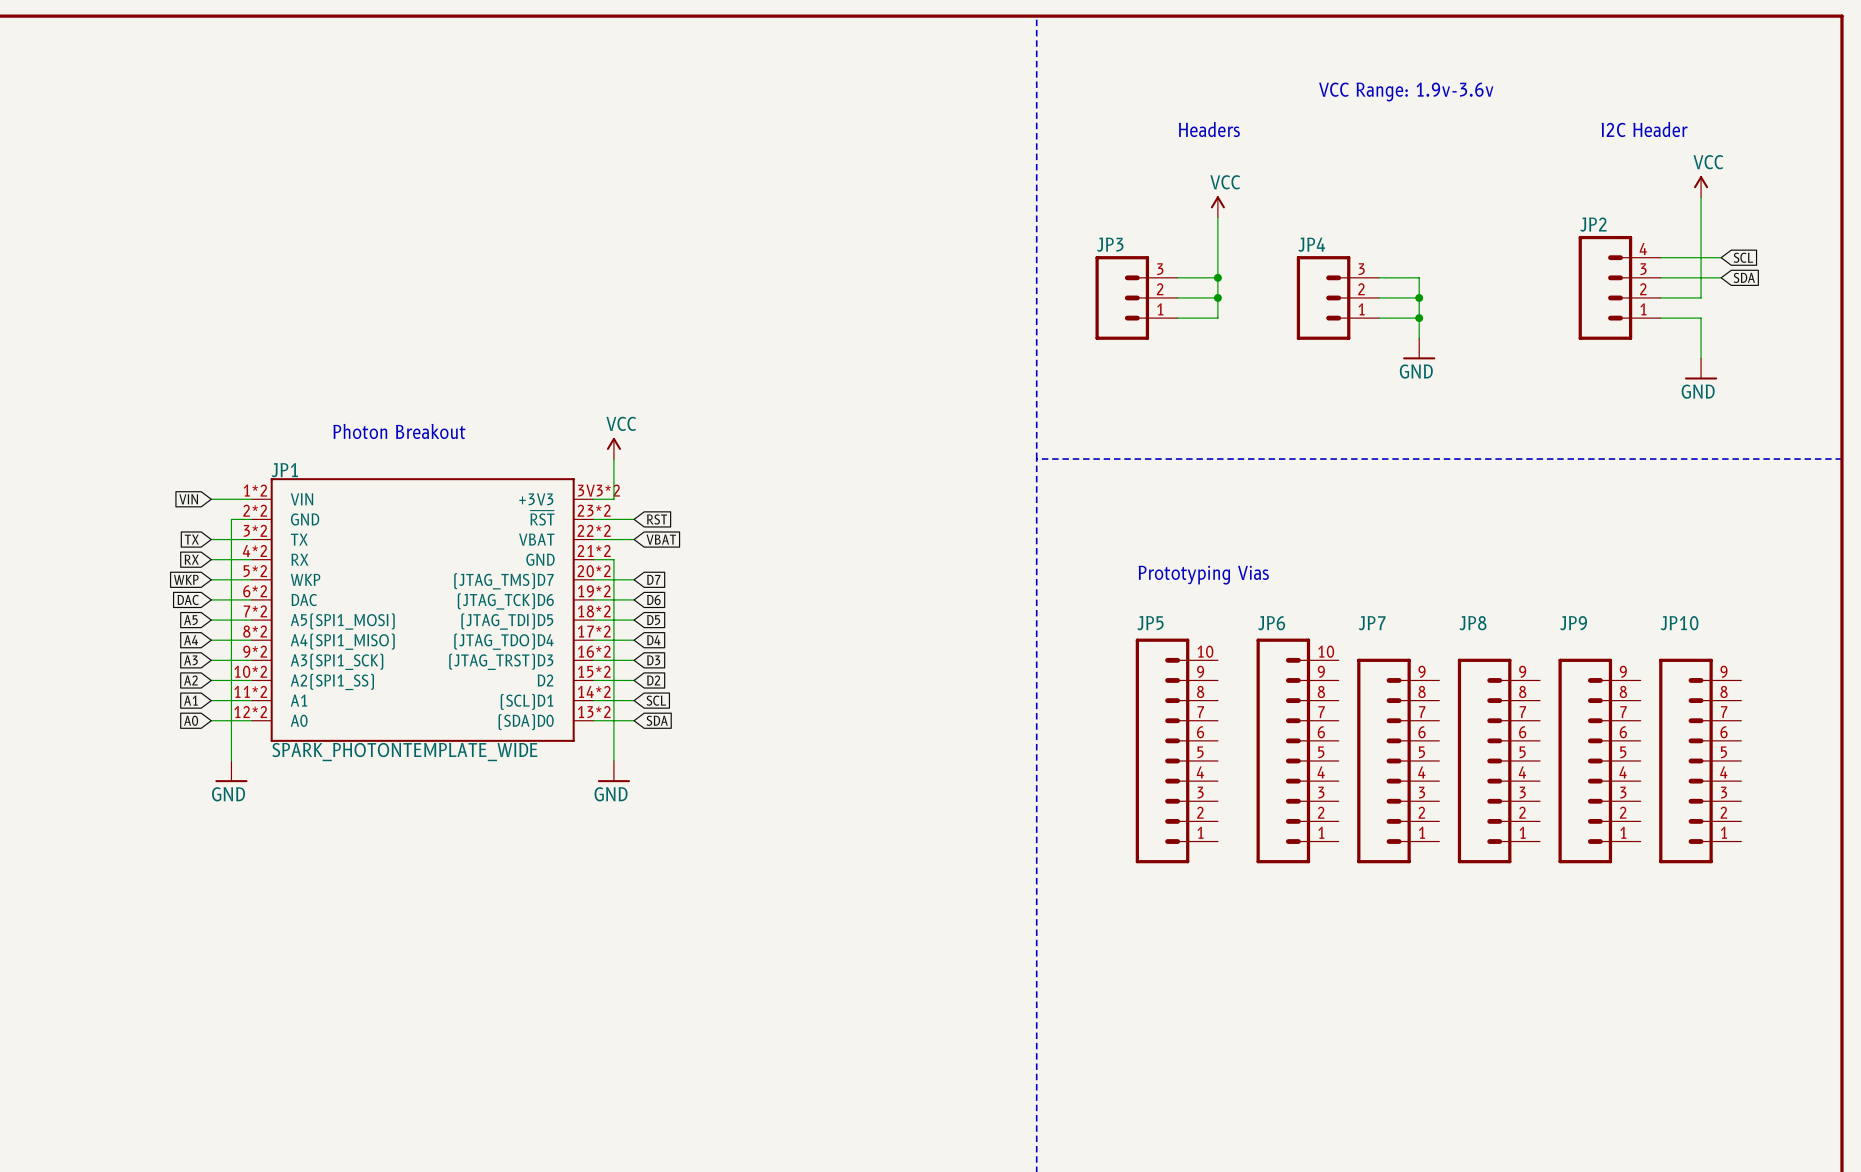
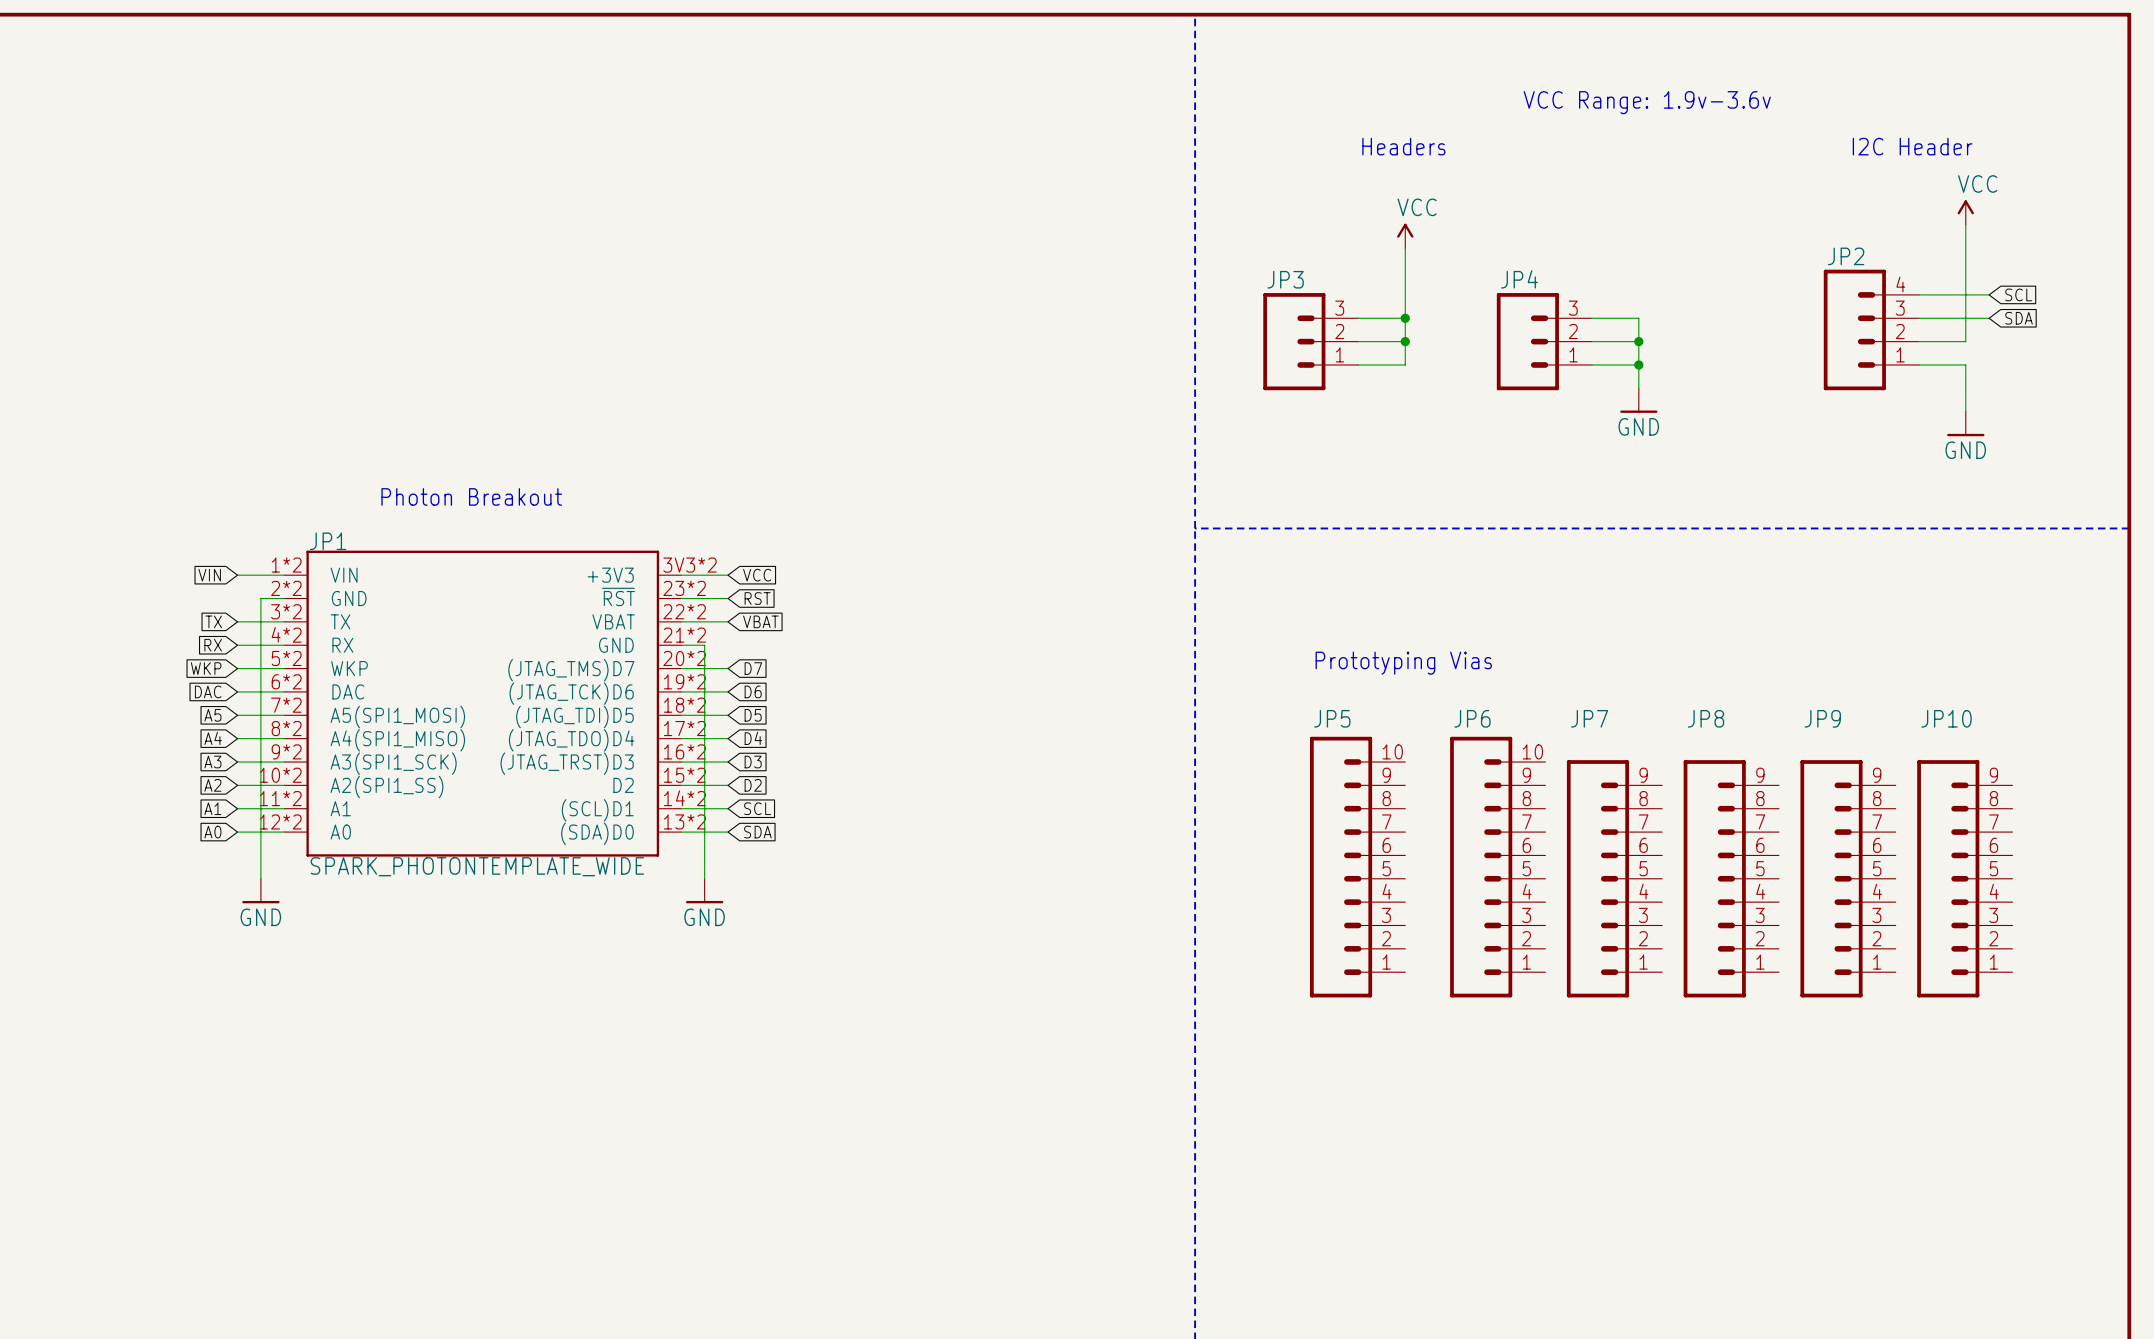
power symbol: VCC (613, 448) -> none
wire: (613, 459) (613, 499) -> (728, 575) (704, 575)
global label: none -> VCC (757, 575)

